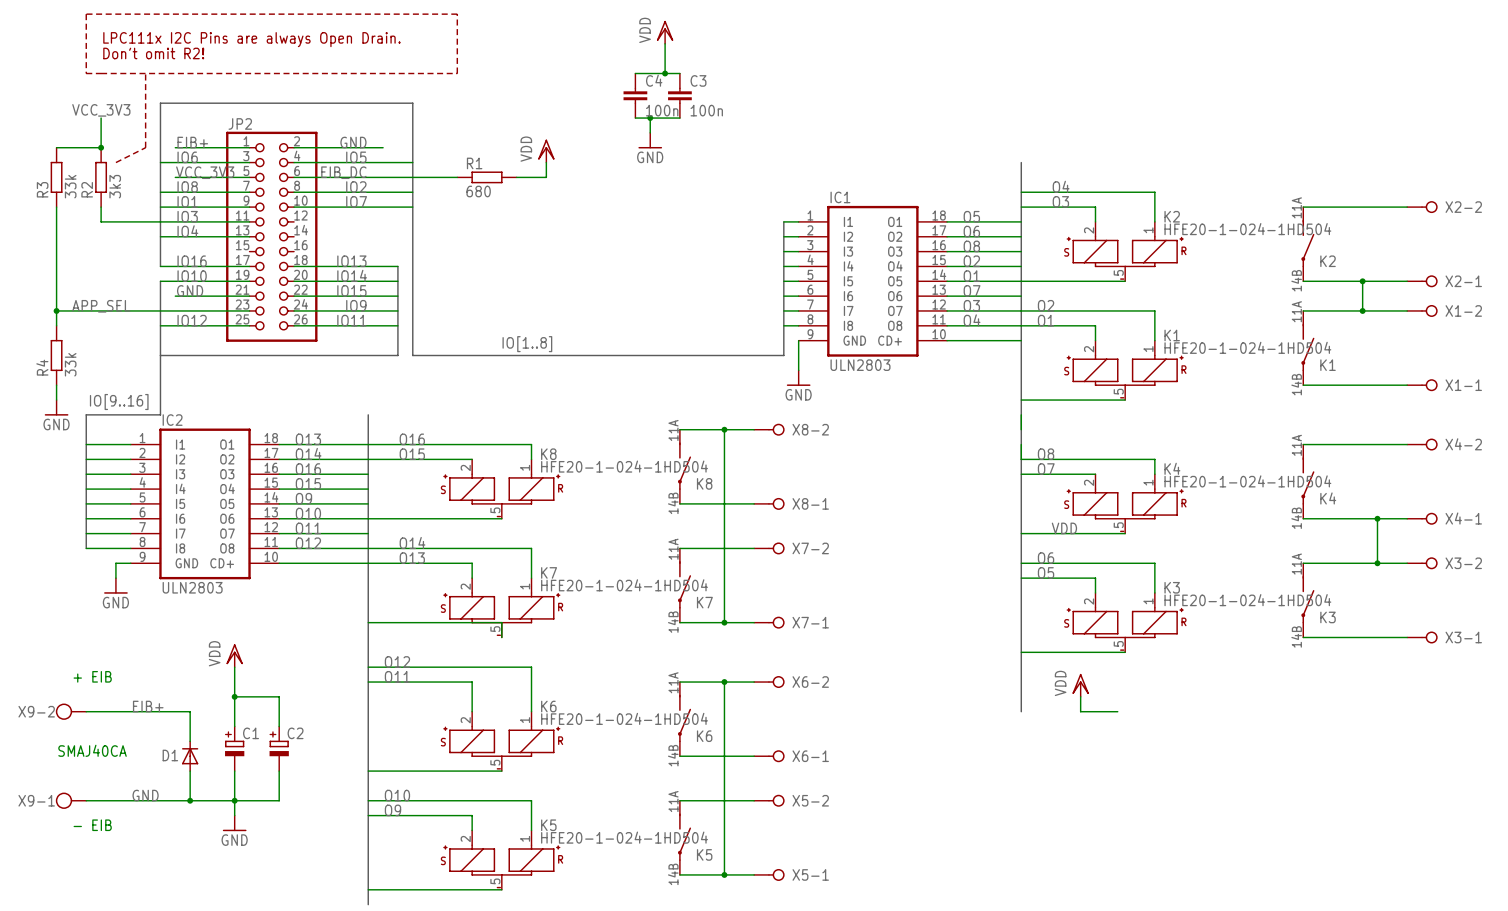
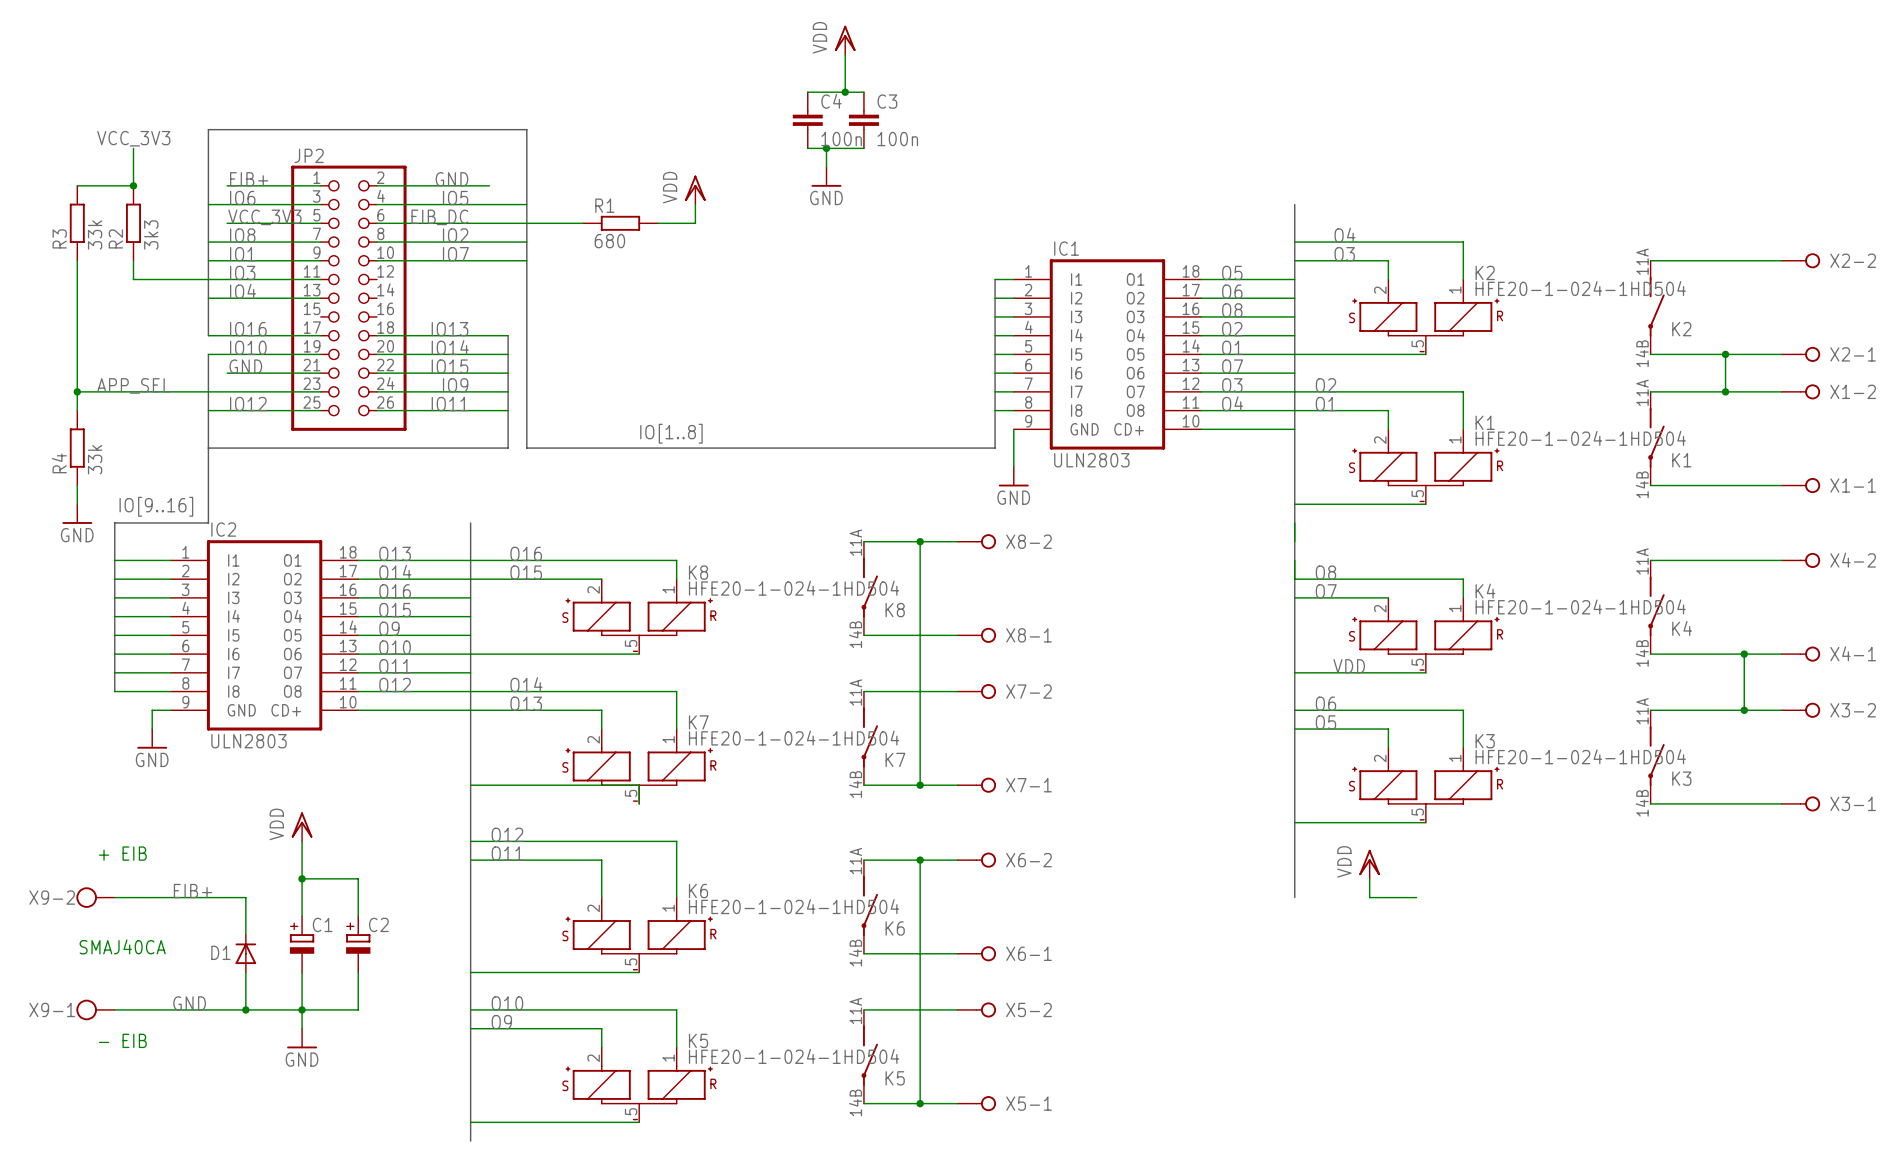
line: (86, 14) (457, 14) (457, 73) (86, 73) (86, 14) -> none
text: LPC111x I2C Pins are always Open Drain. (251, 39) -> none
text: Don't omit R2! (153, 53) -> none
line: (145, 73) (145, 147) (115, 162) -> none

